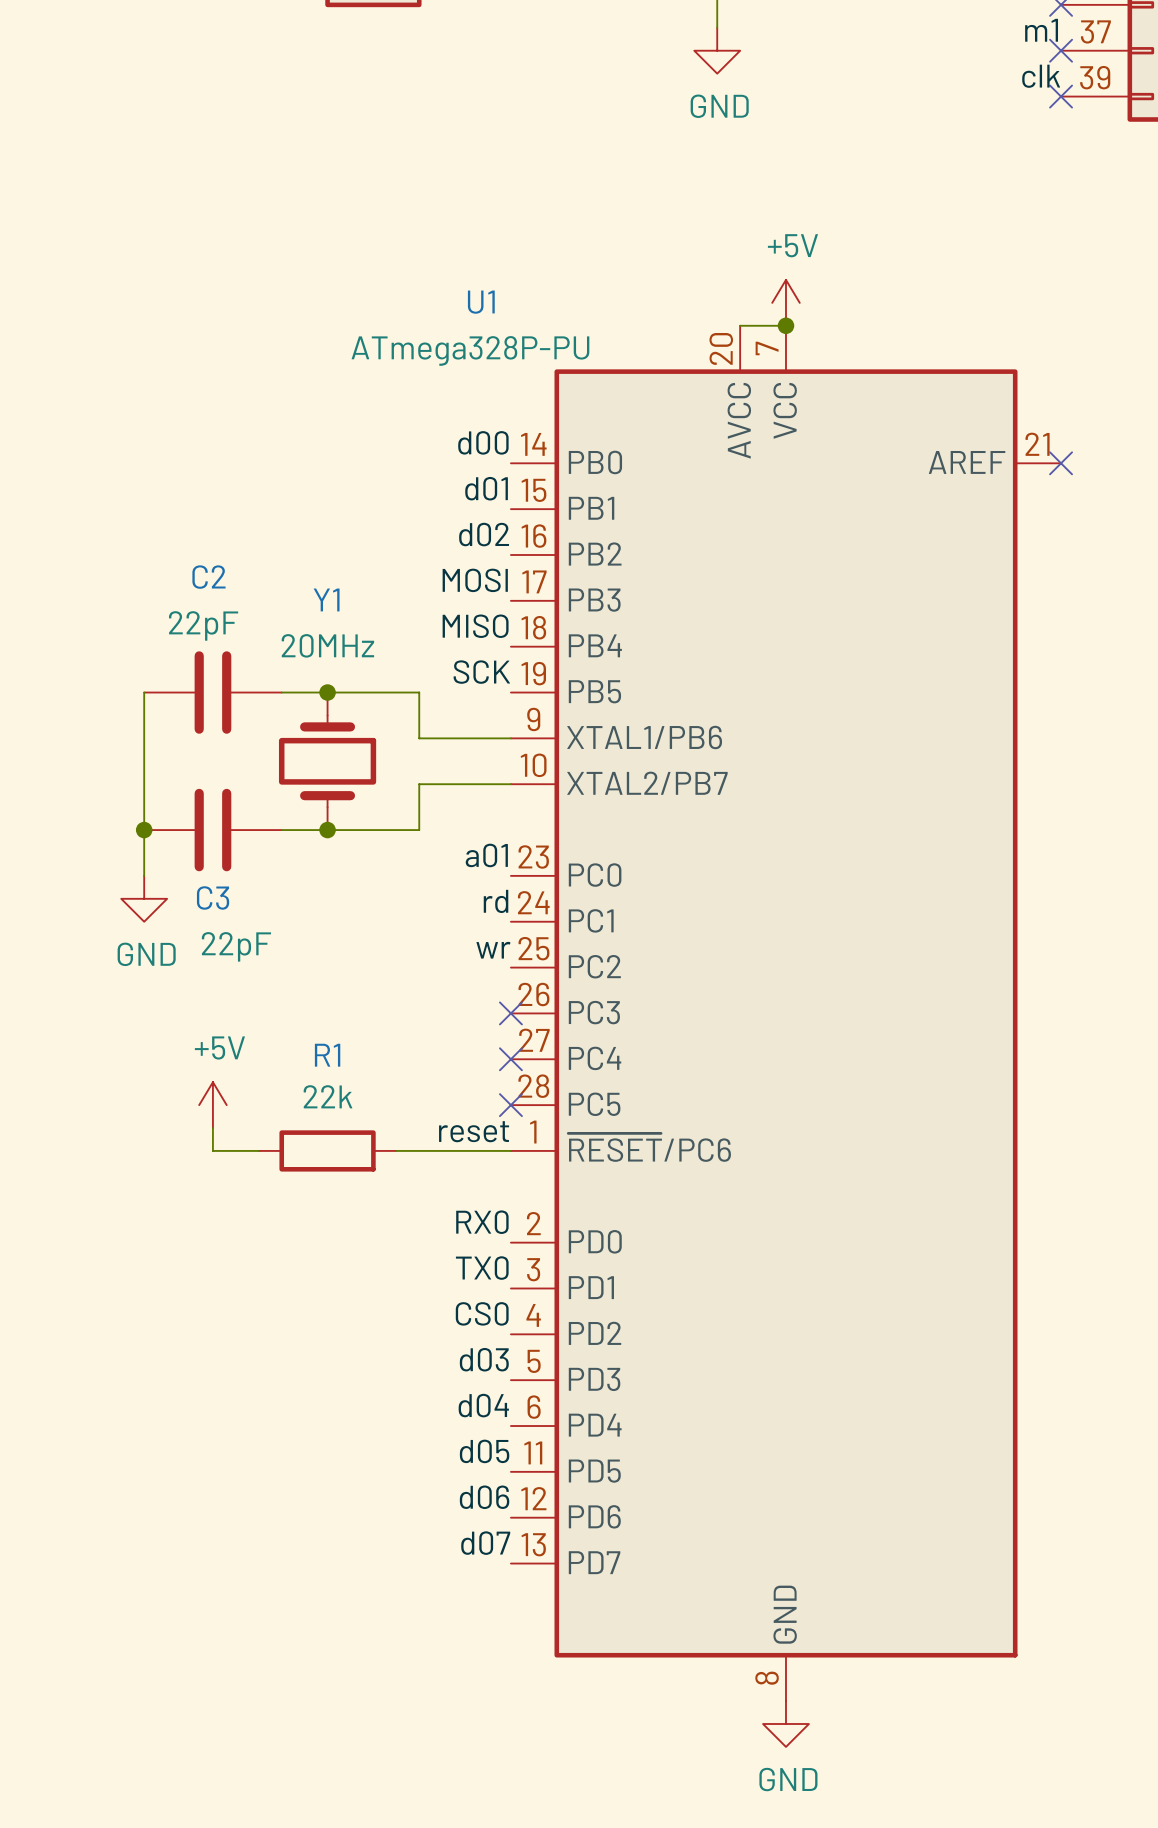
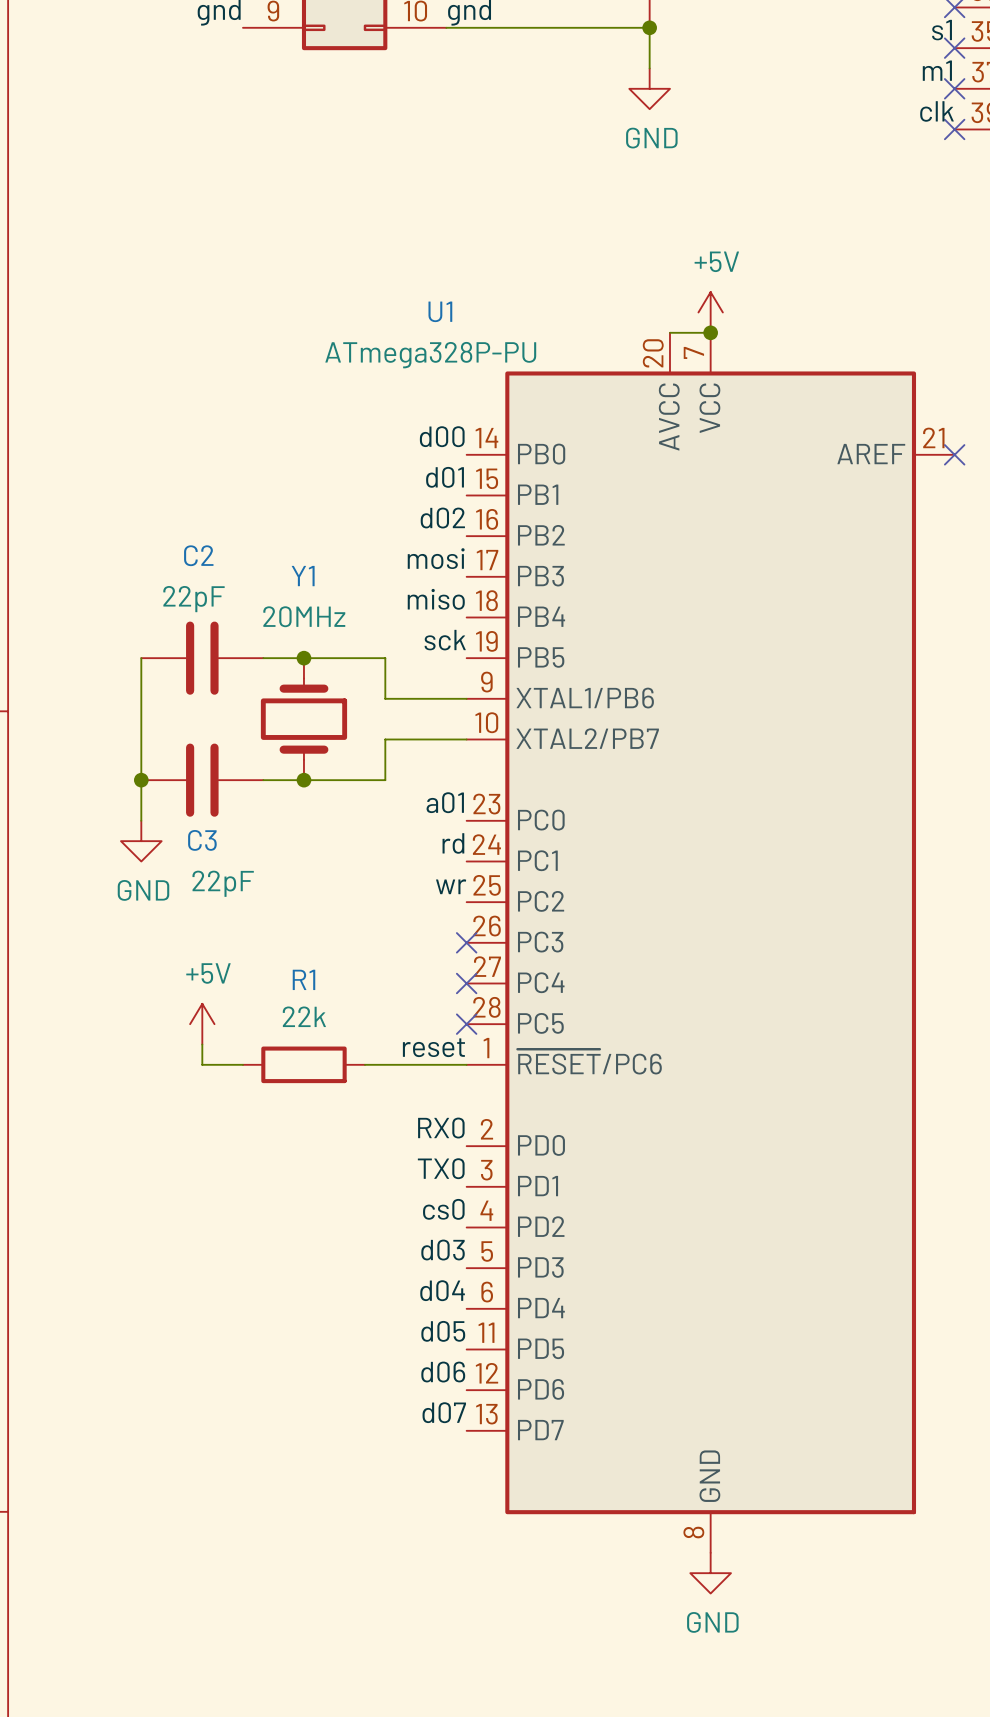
label: MOSI (475, 580) -> mosi (436, 558)
label: MISO (475, 626) -> miso (436, 599)
label: SCK (481, 672) -> sck (445, 640)
label: CS0 (482, 1313) -> cs0 (443, 1209)

